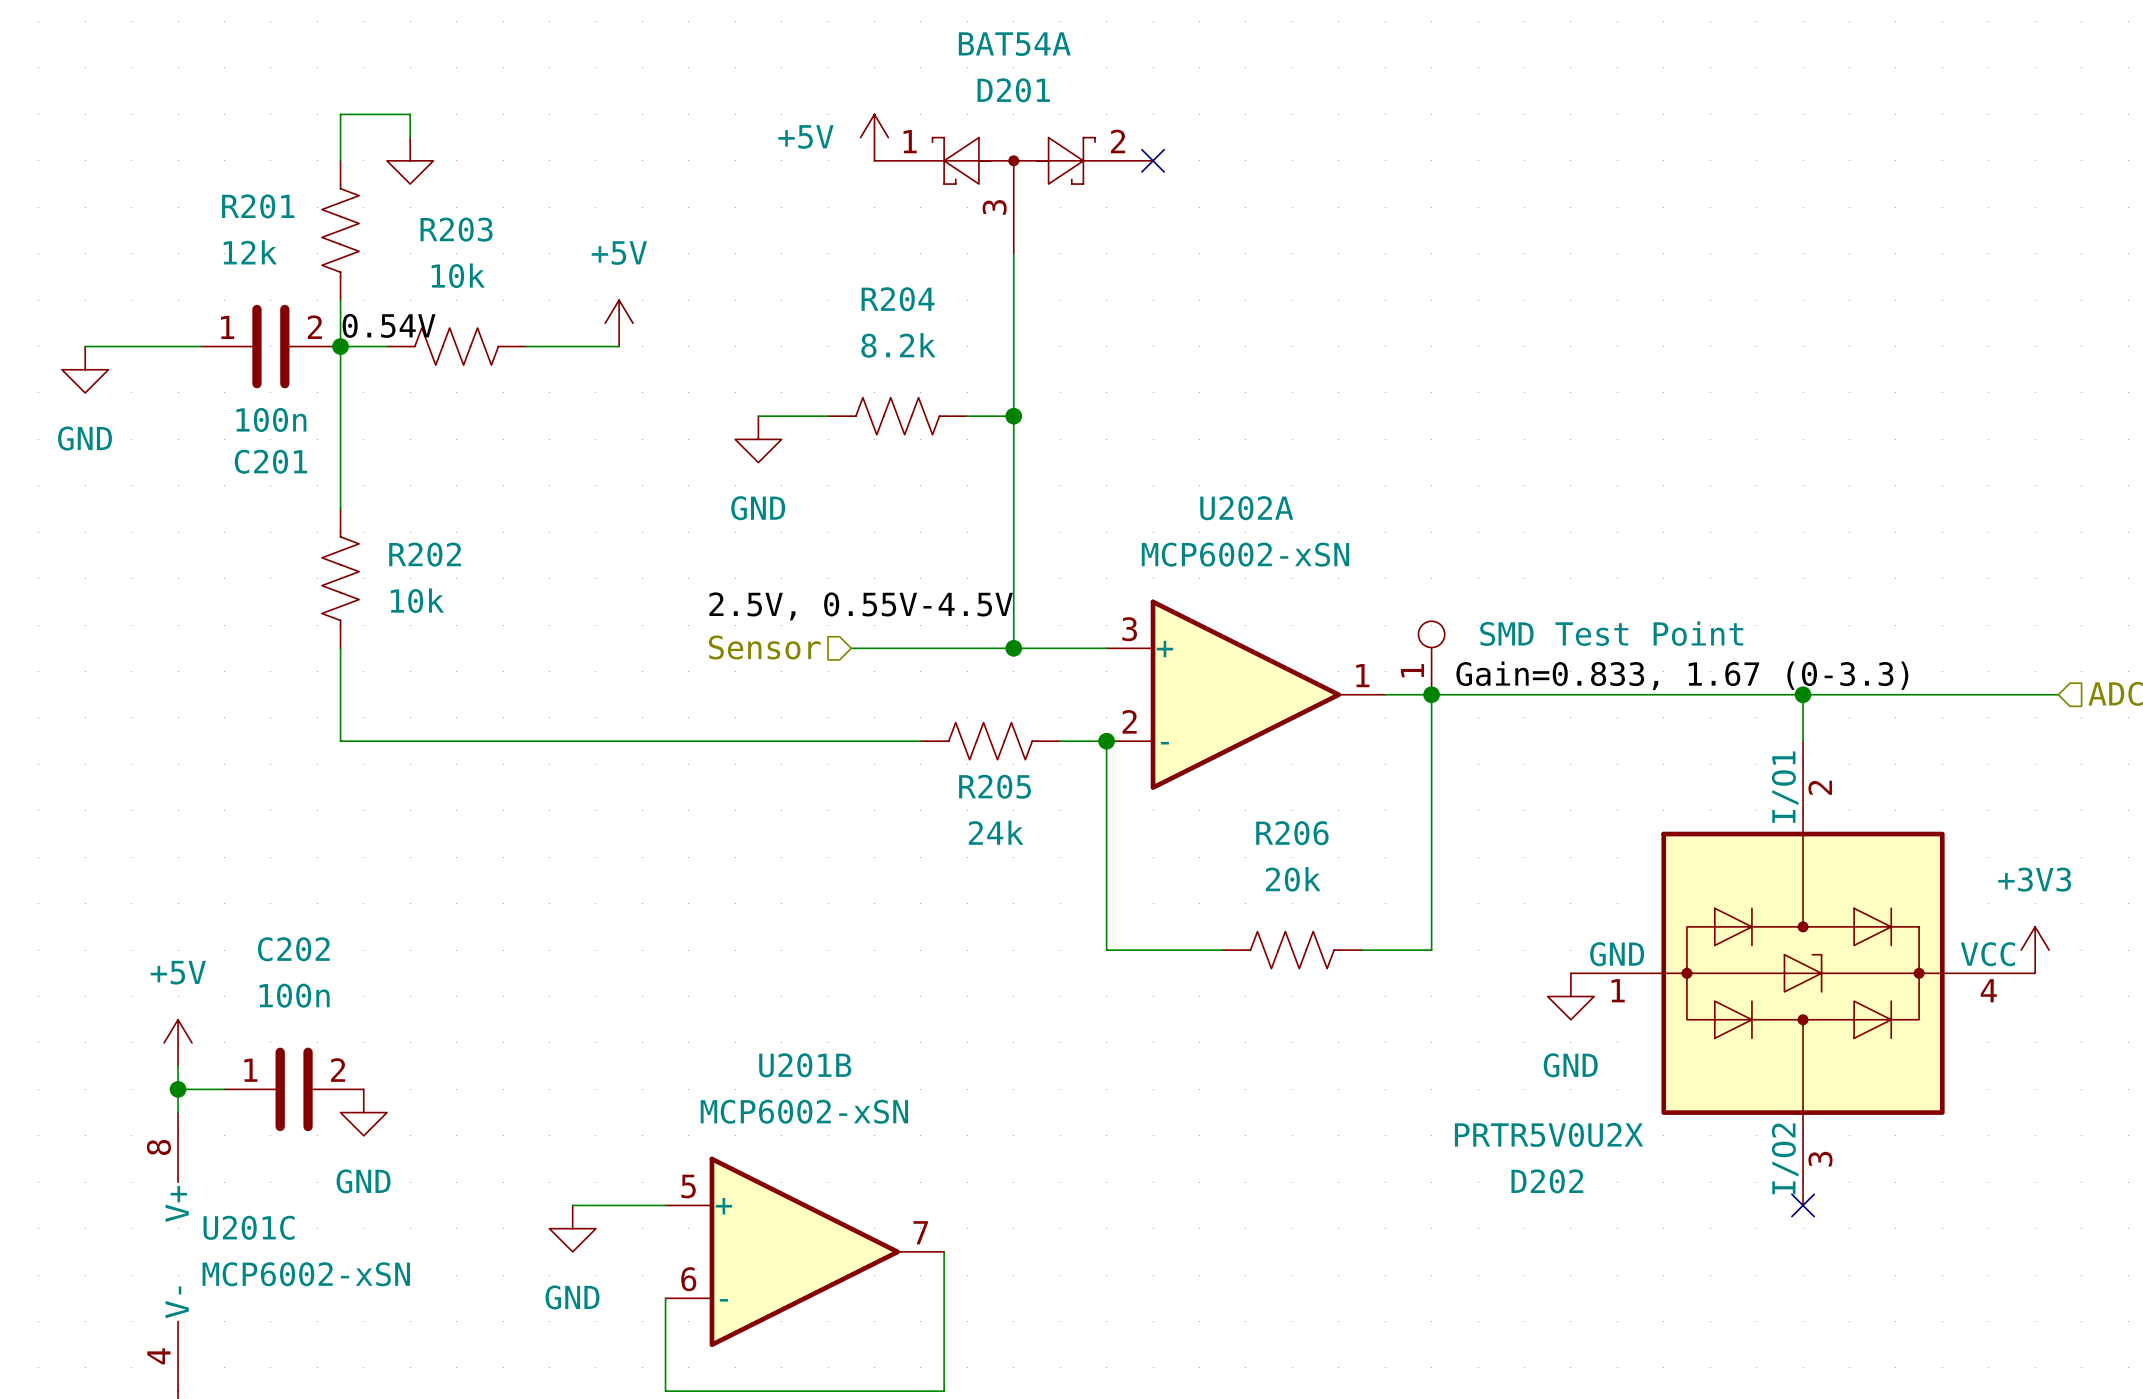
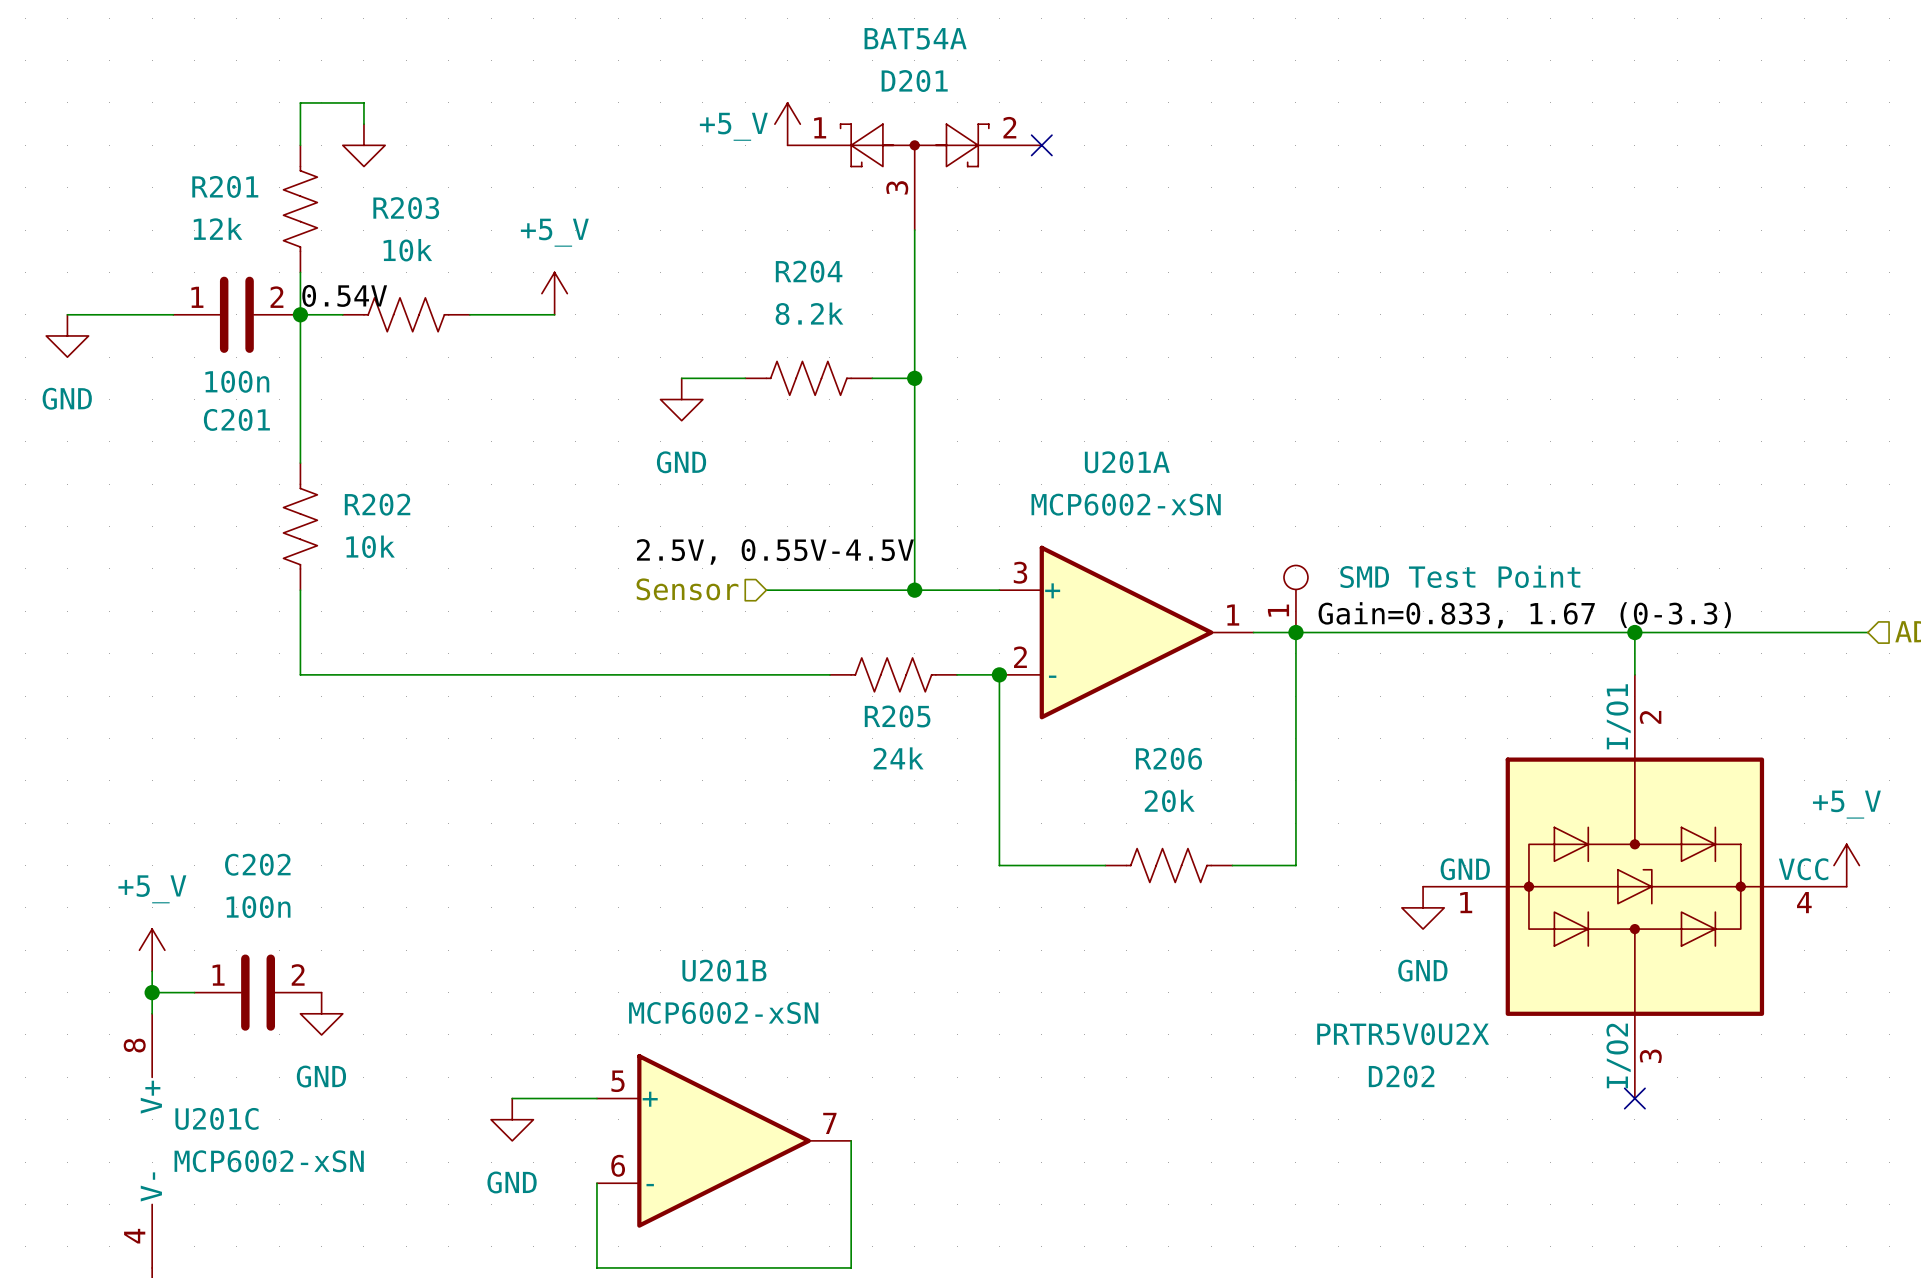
power symbol: +5V (874, 137) -> +5_V (787, 124)
power symbol: +5V (619, 323) -> +5_V (554, 293)
U202A name: U202A (1246, 508) -> U201A (1127, 462)
power symbol: +3V3 (2035, 950) -> +5_V (1846, 865)
power symbol: +5V (178, 1042) -> +5_V (152, 950)

